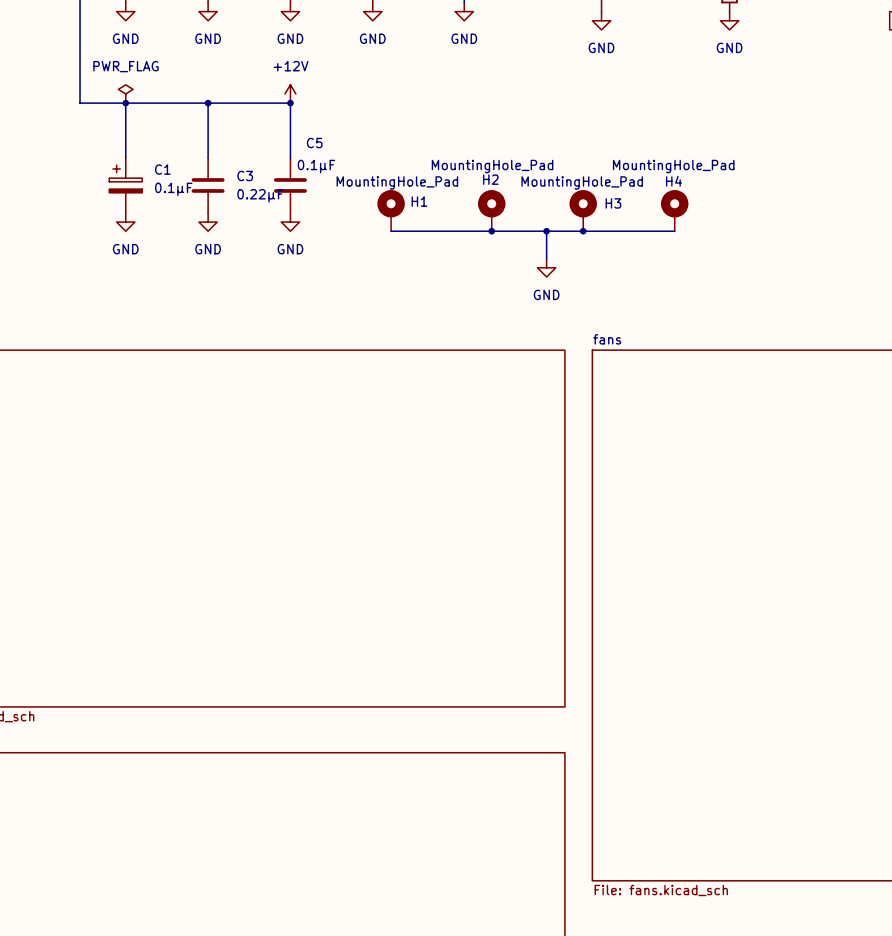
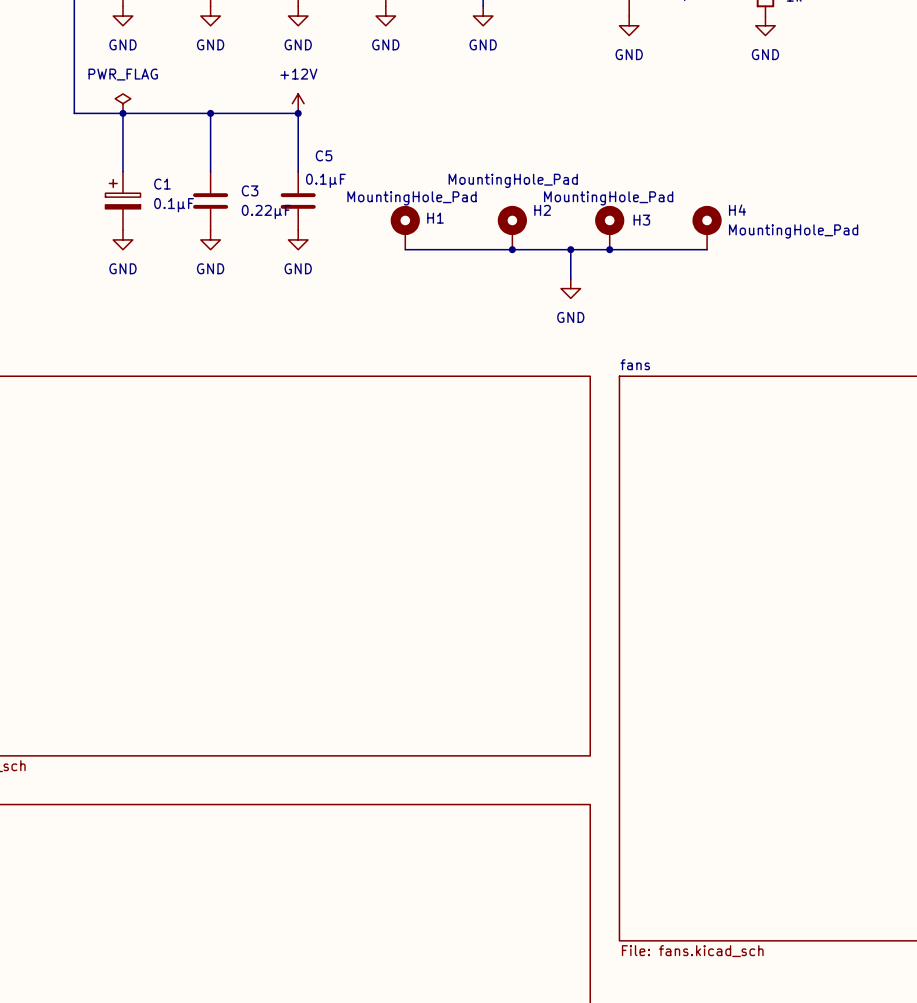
H4 value position: MountingHole_Pad (673, 166) -> MountingHole_Pad (793, 231)
H2 name position: H2 (490, 179) -> H2 (542, 210)
H4 name position: H4 (674, 181) -> H4 (737, 210)

